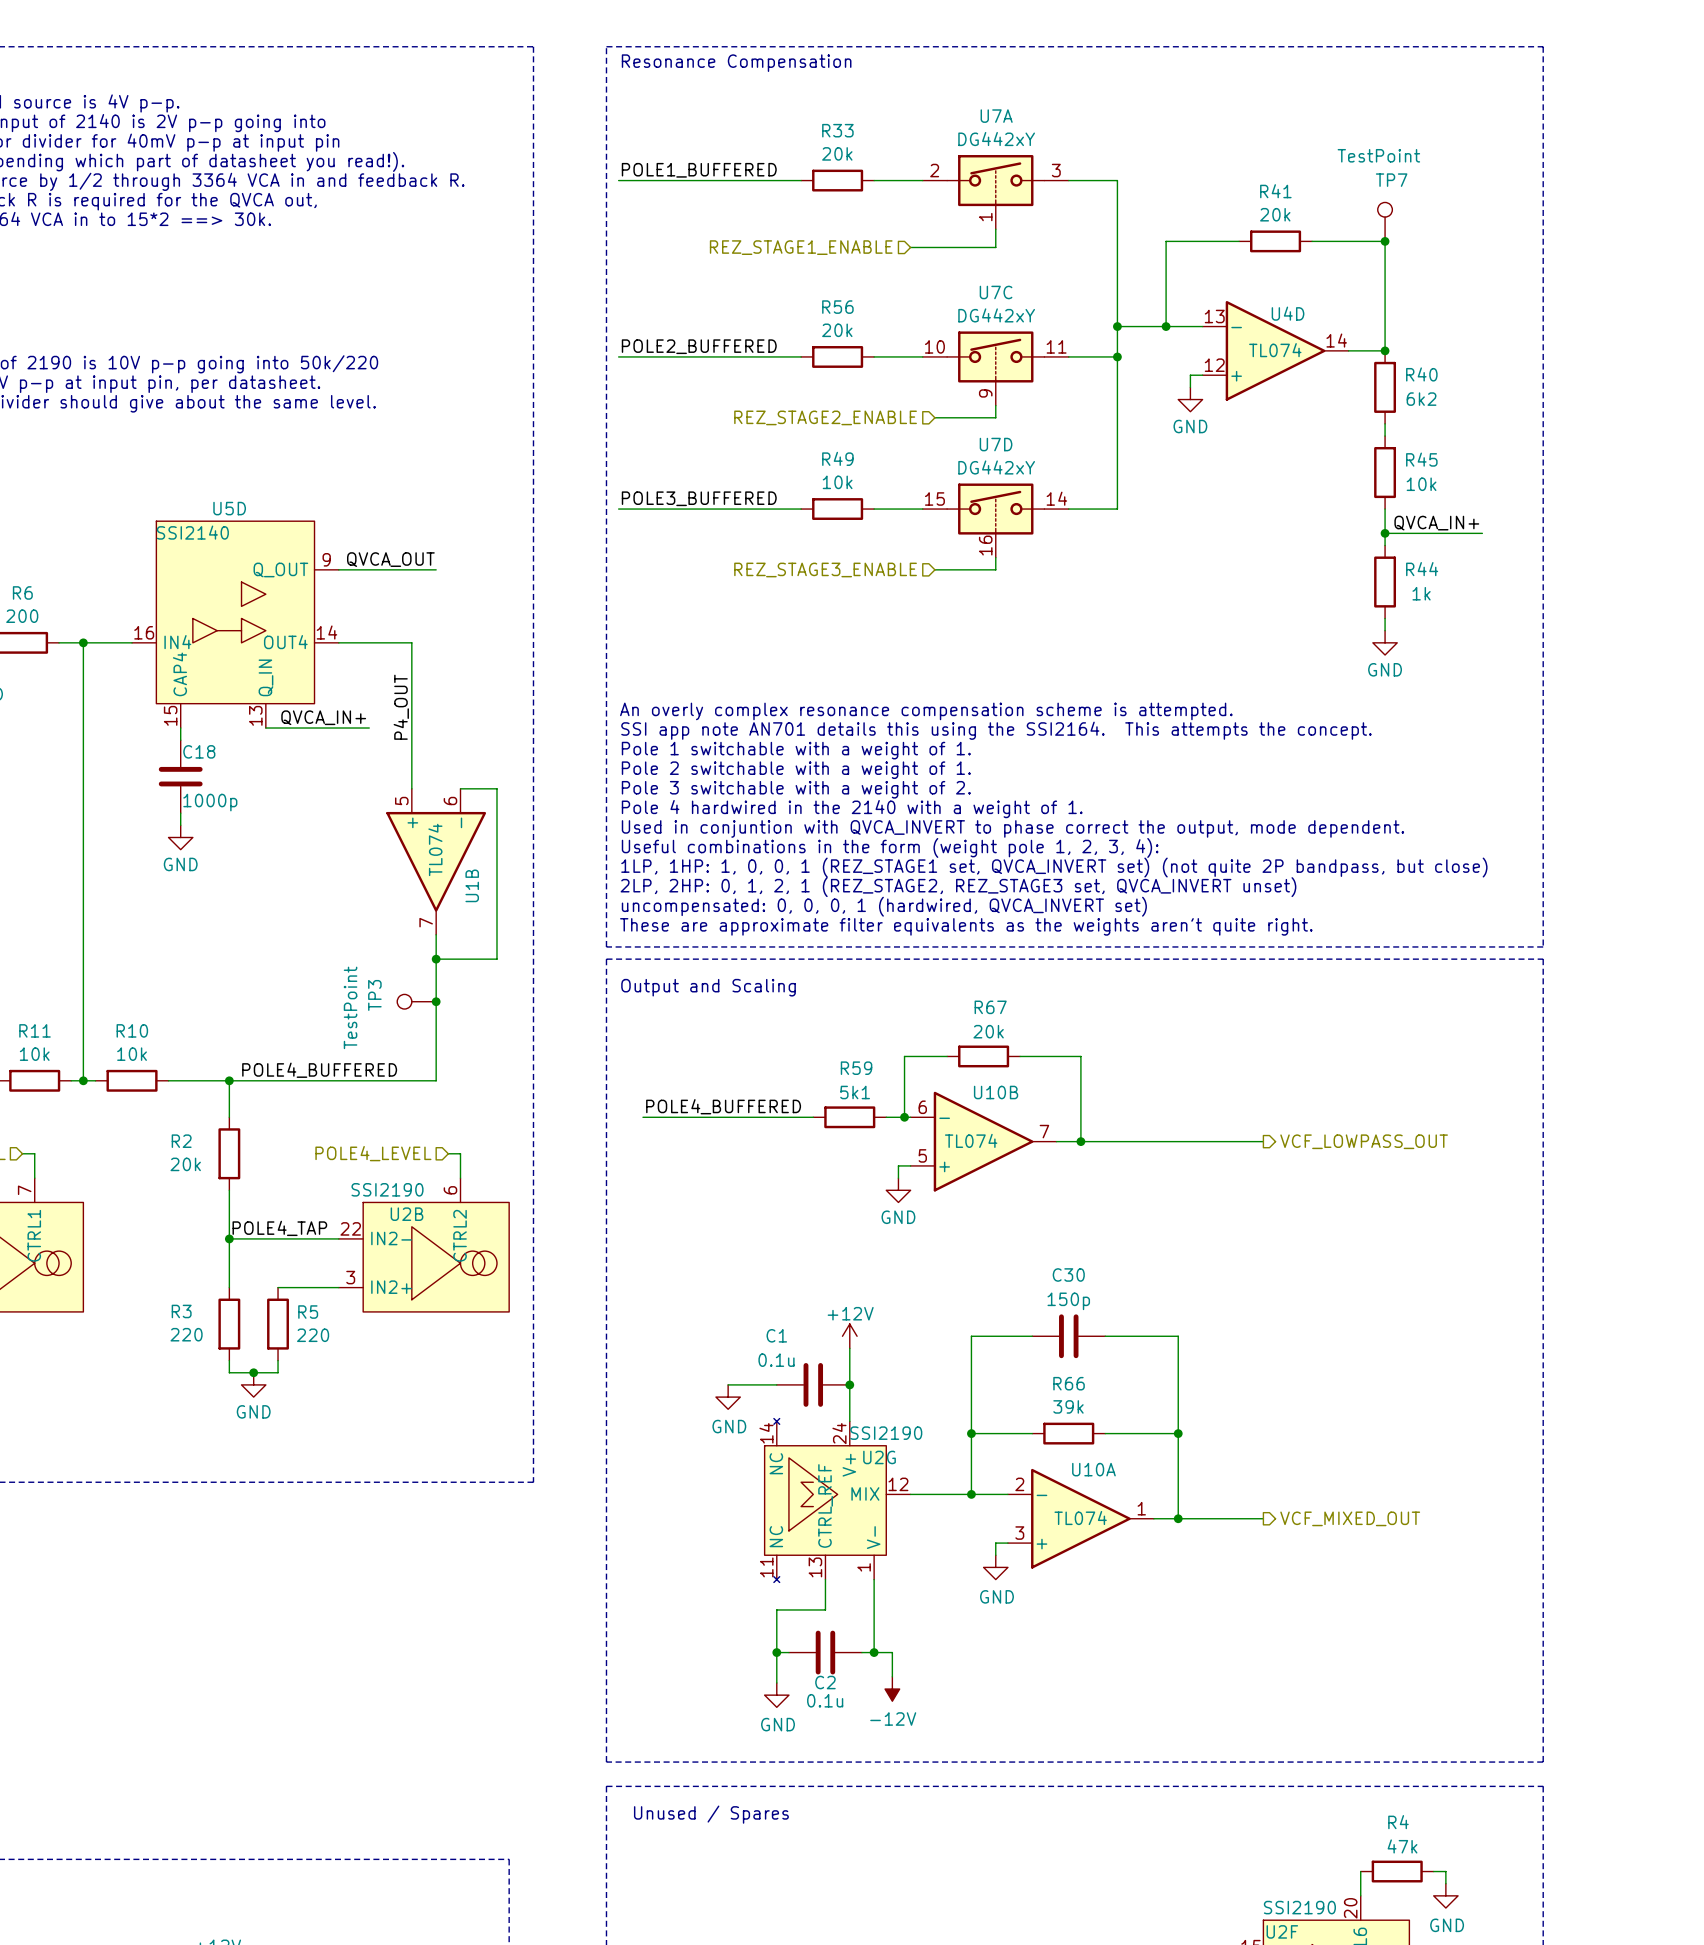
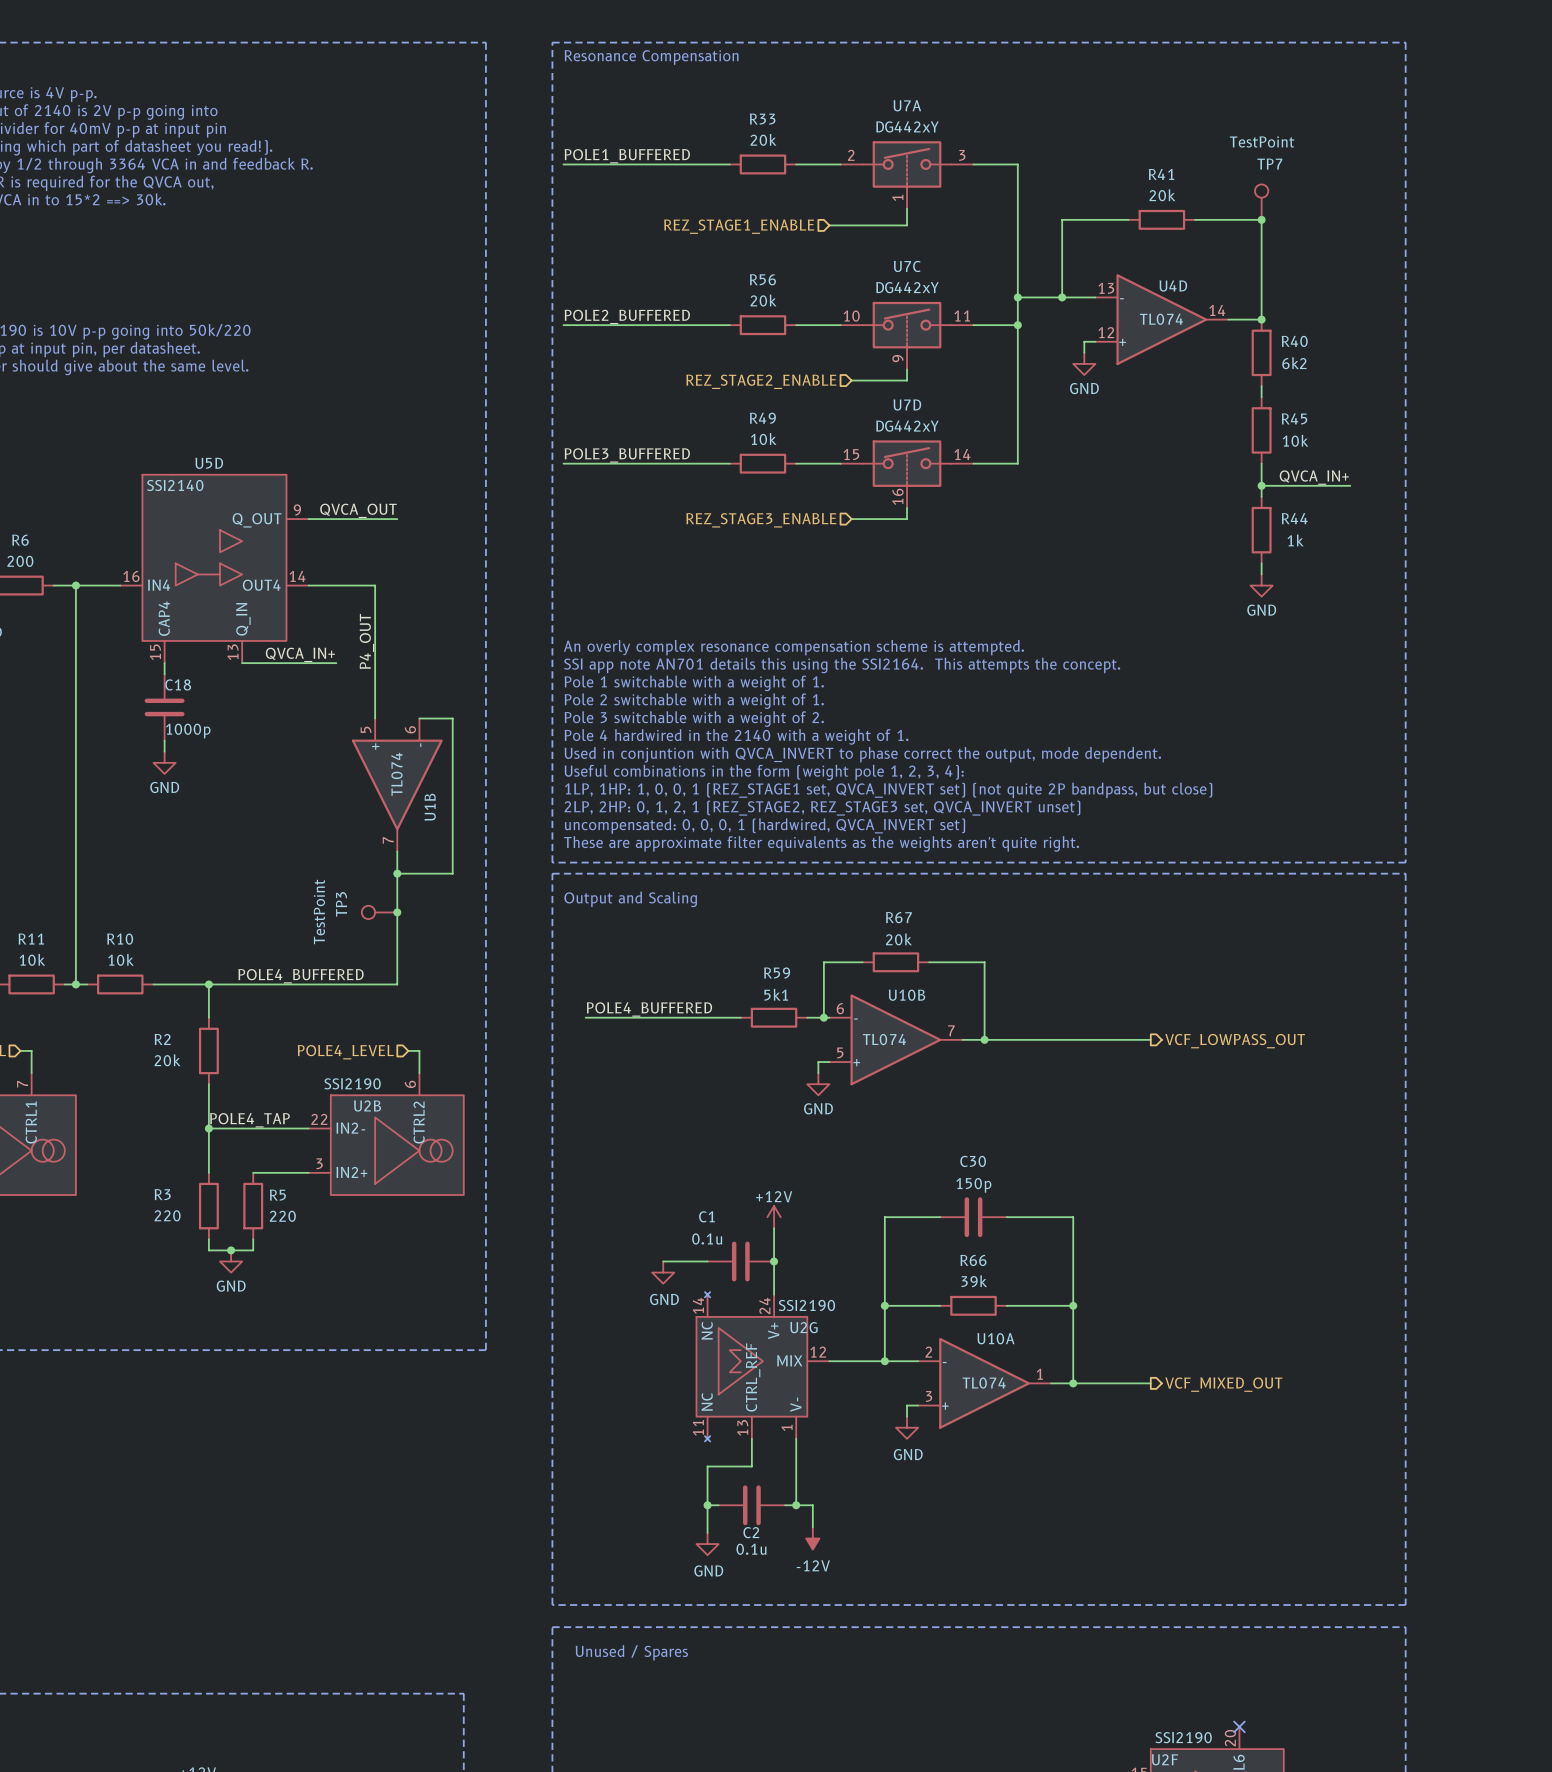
wire: (1360, 1871) (1360, 1895) -> none
R4: 47k (1397, 1871) -> none
wire: (1433, 1871) (1445, 1871) (1445, 1883) -> none
no-connect mark: none -> (1239, 1726)
power symbol: GND (1445, 1895) -> none

